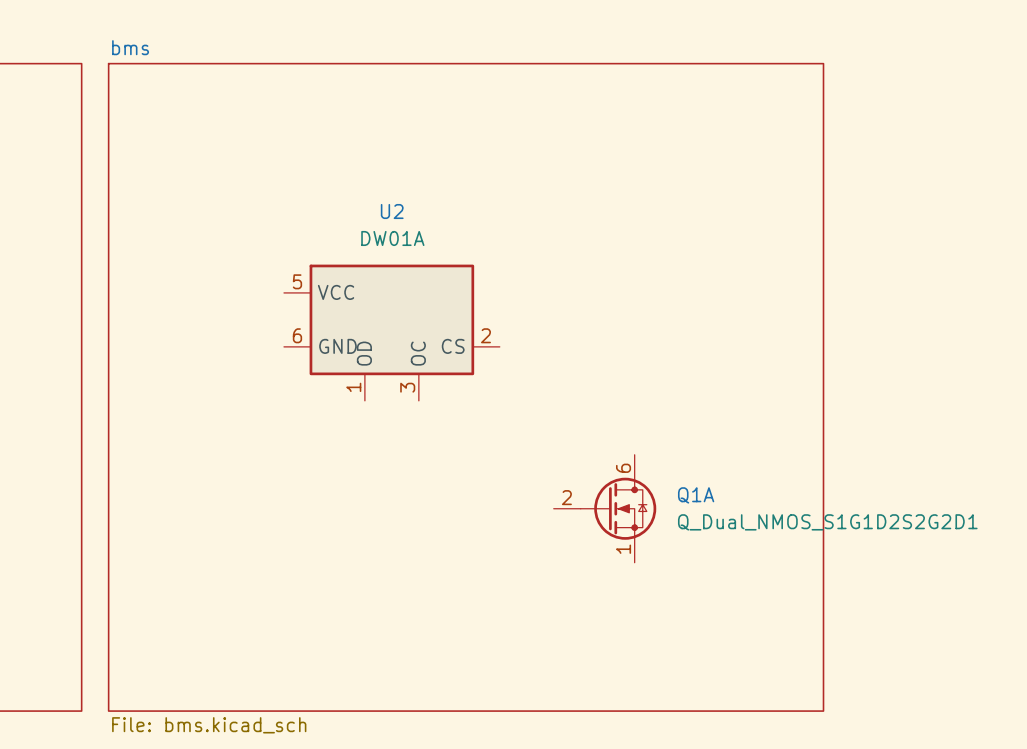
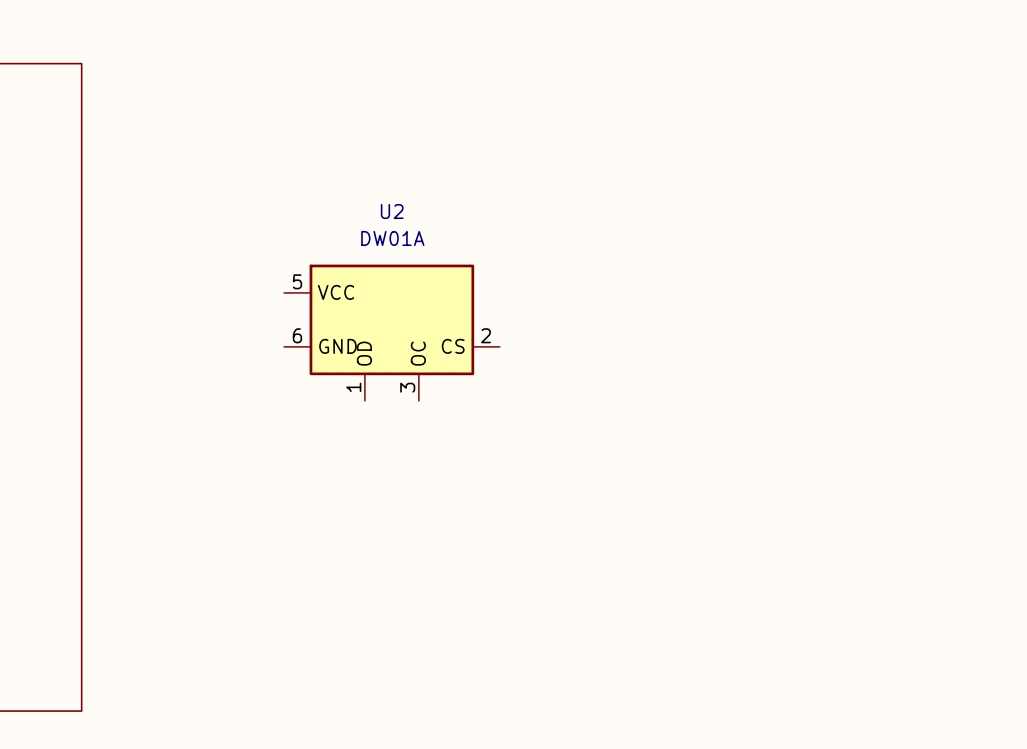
sheet bms: File: bms.kicad_sch (466, 387) -> none
Q1A: Q_Dual_NMOS_S1G1D2S2G2D1 (604, 508) -> none

